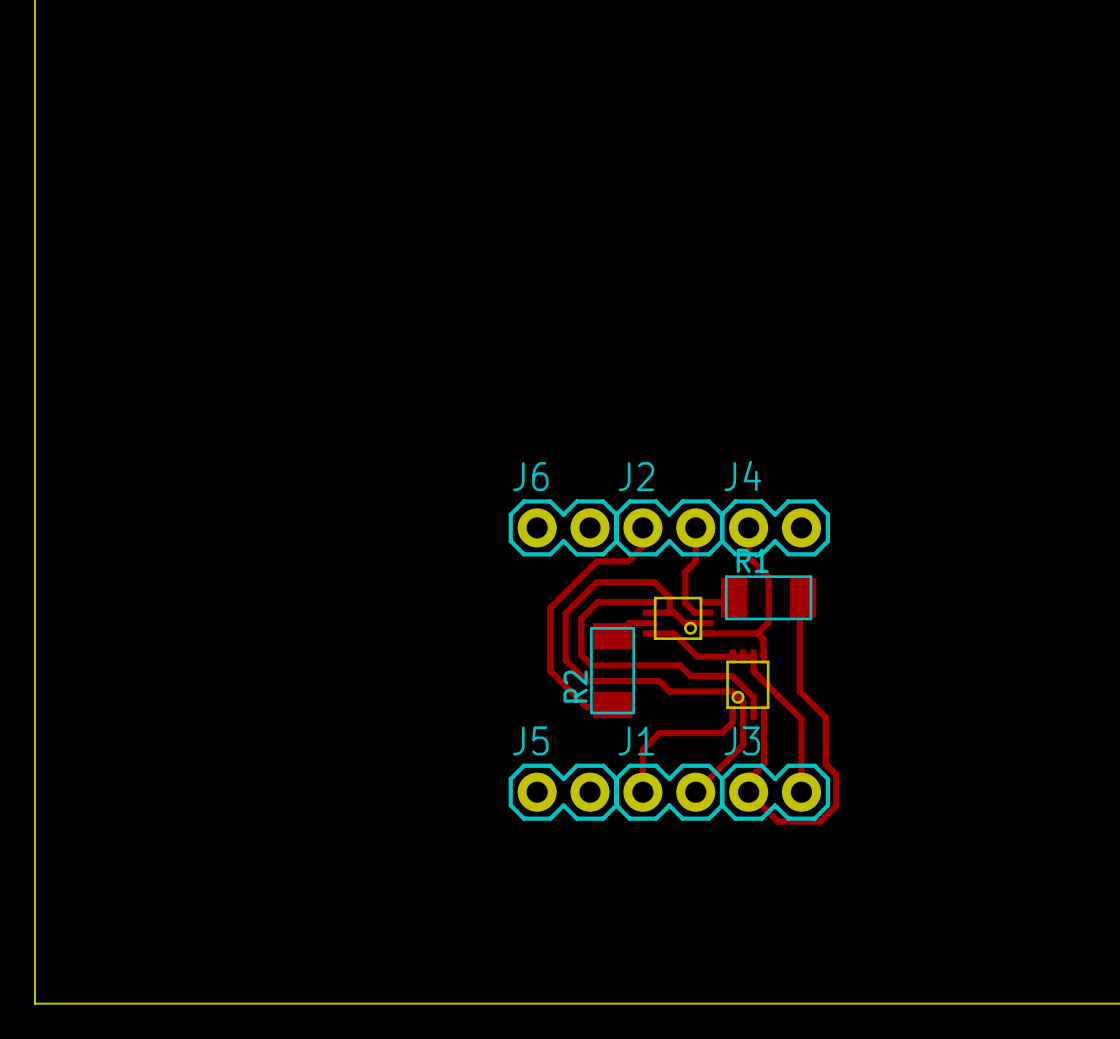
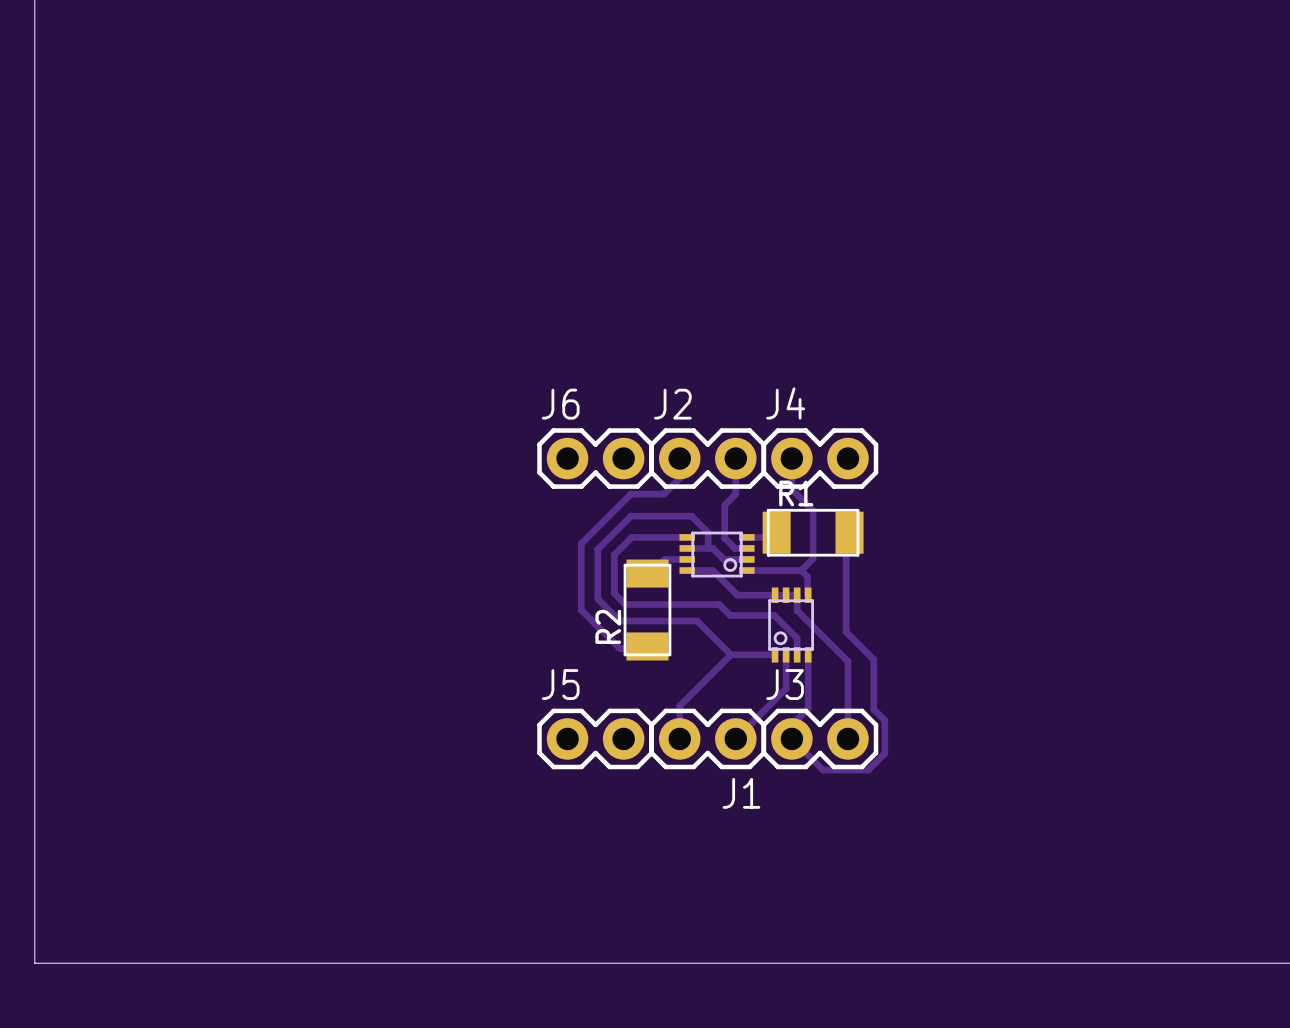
track: (669, 691) (732, 691) (743, 702) (743, 712) -> (708, 632) (730, 654)
track: none -> (730, 654) (775, 654)
track: (732, 712) (732, 722) (721, 733) (659, 733) (642, 749) (642, 761) -> (730, 654) (679, 706)
J1 name position: J1 (636, 740) -> J1 (741, 793)

